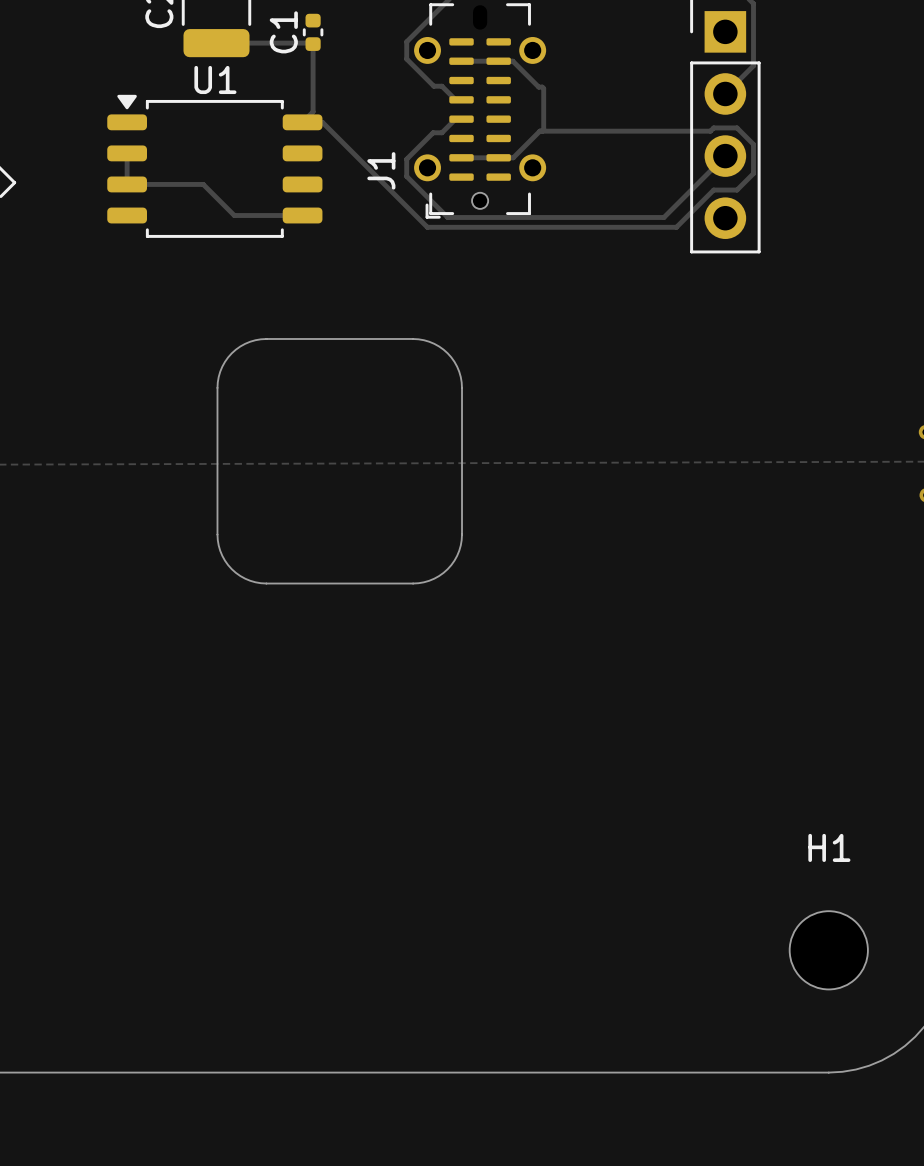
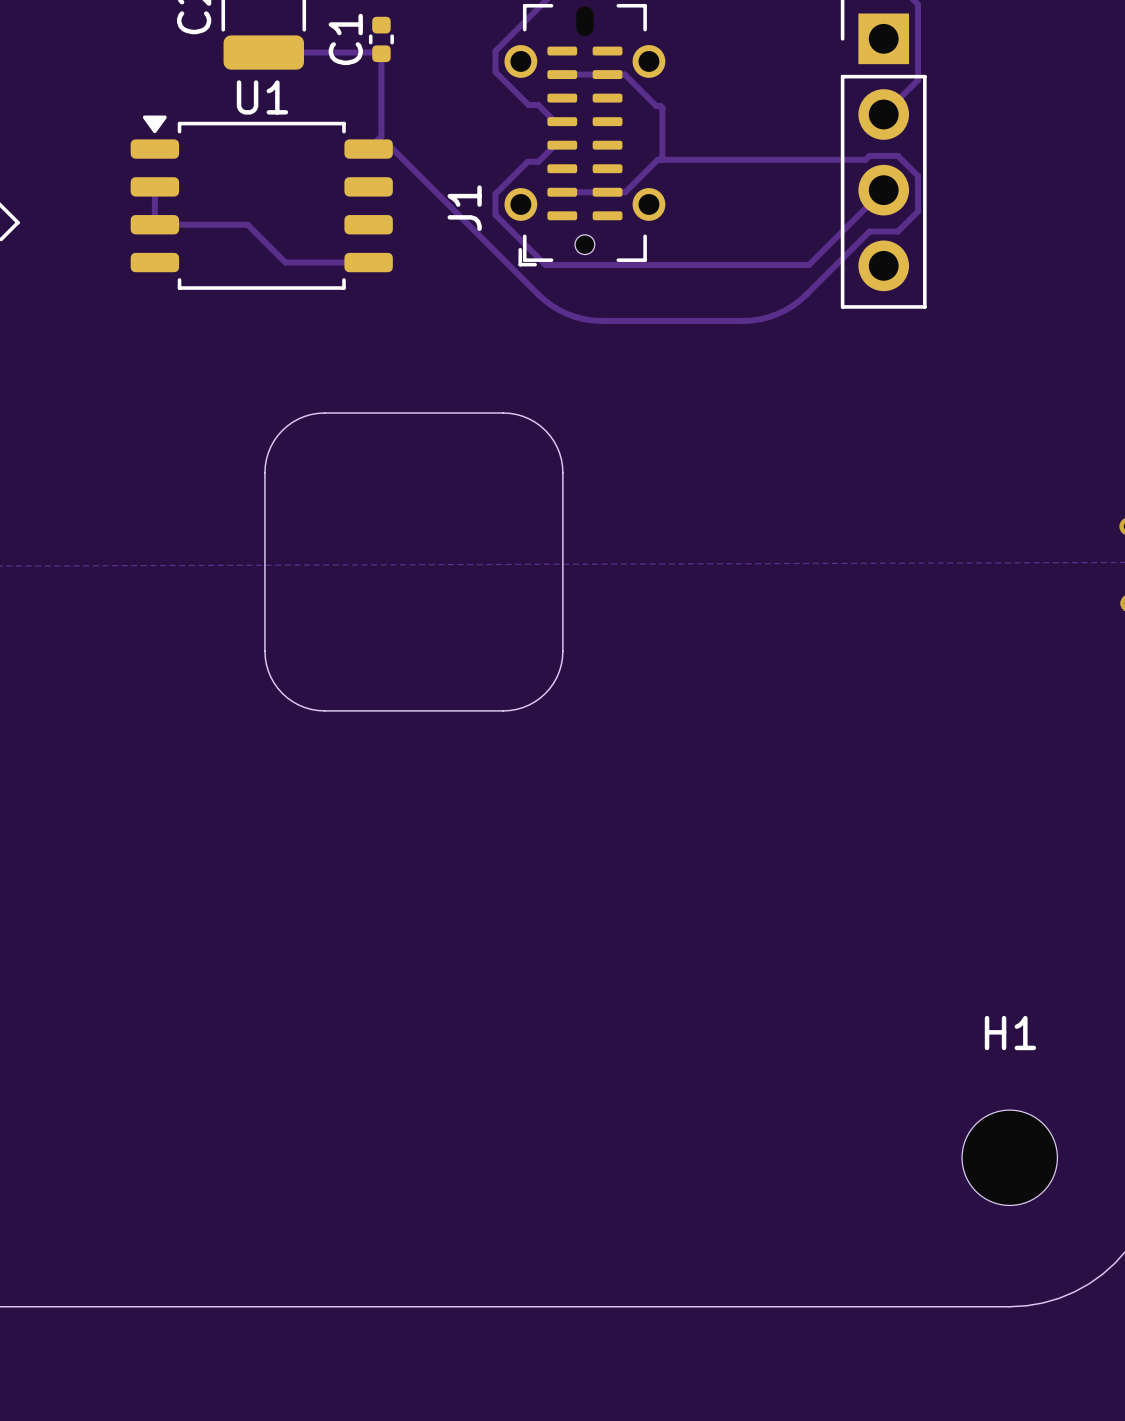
track: (427, 227) (676, 227) -> (520, 276) (545, 300) (559, 310) (575, 317) (601, 320) (743, 320) (760, 319) (777, 314) (792, 305) (824, 276)

